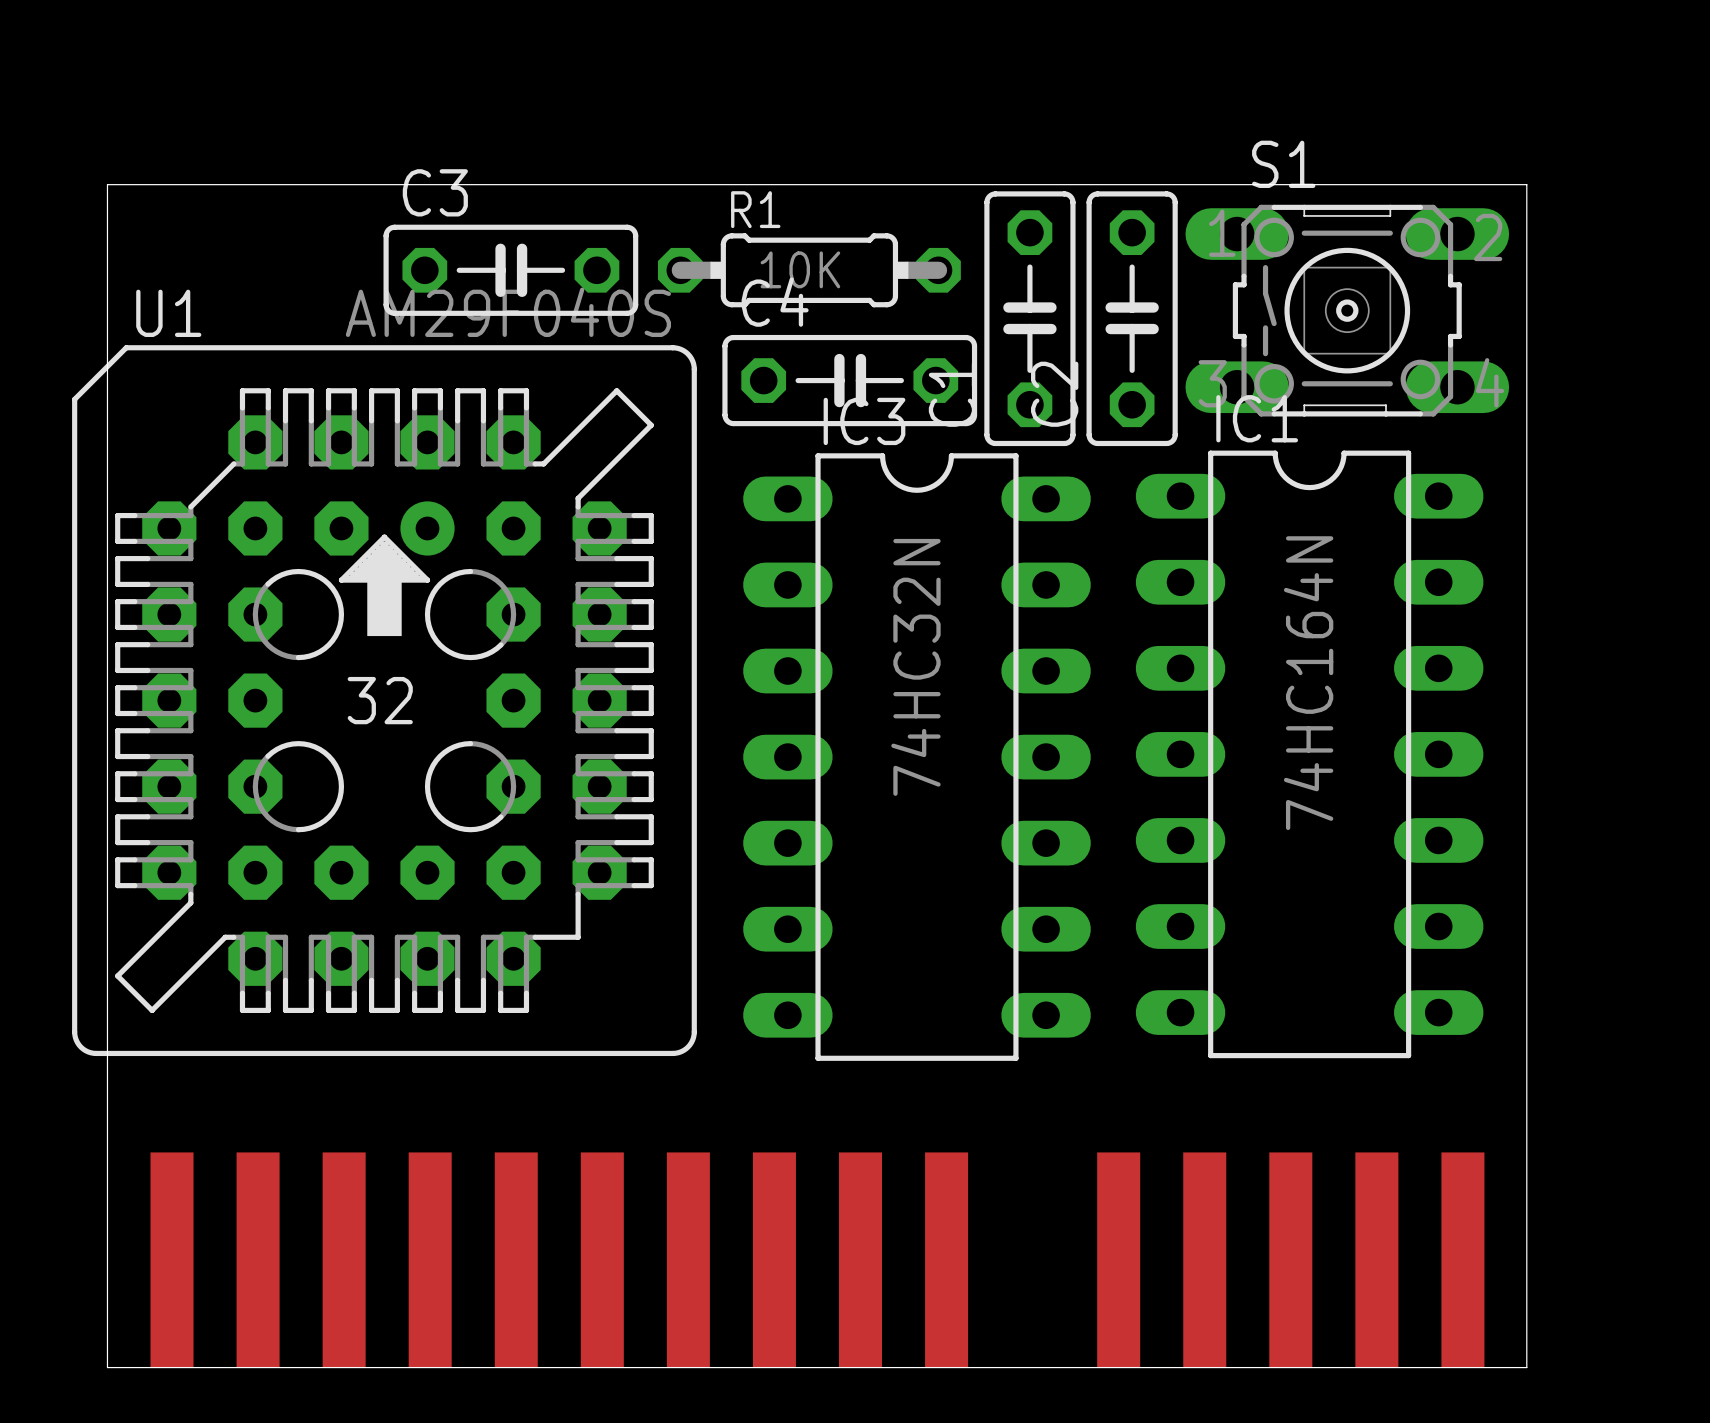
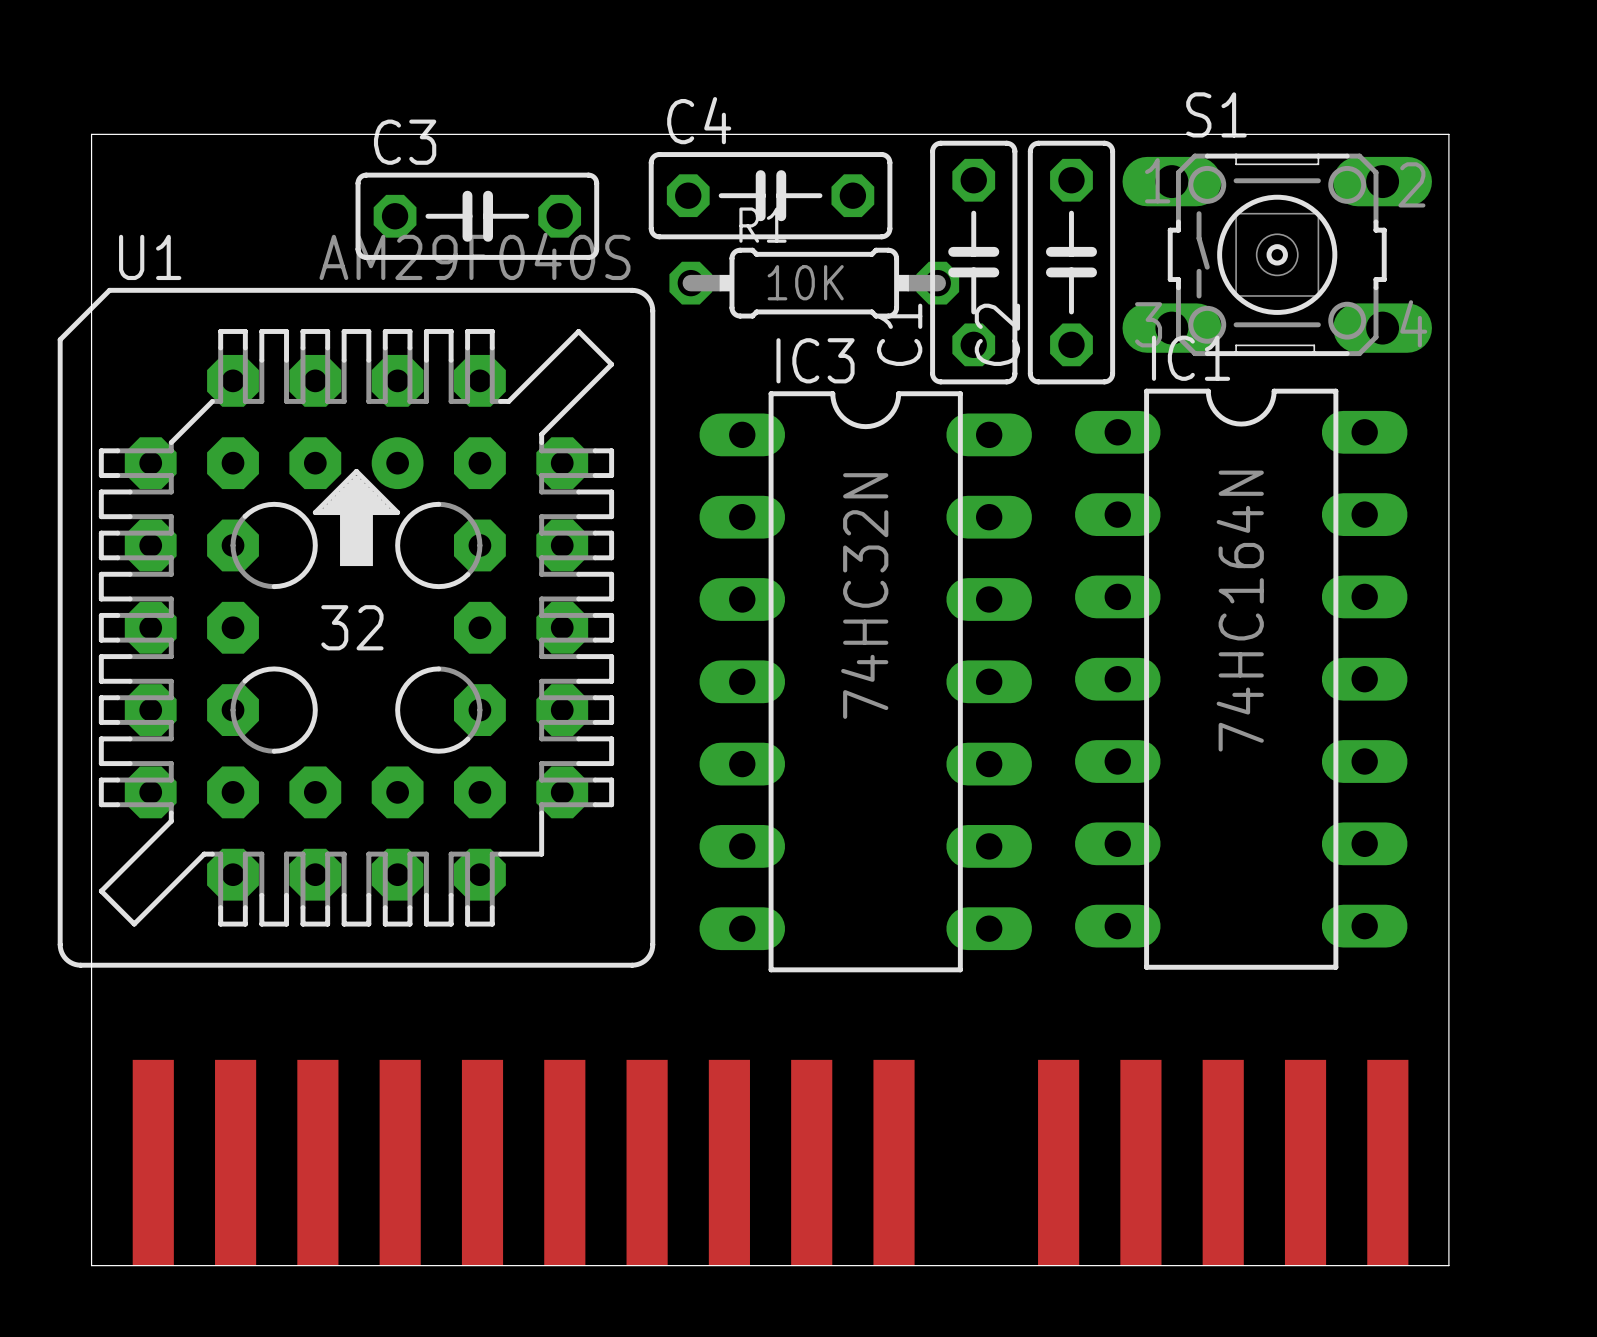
R1 position: (809, 270) -> (814, 283)
C4 position: (849, 380) -> (770, 195)

